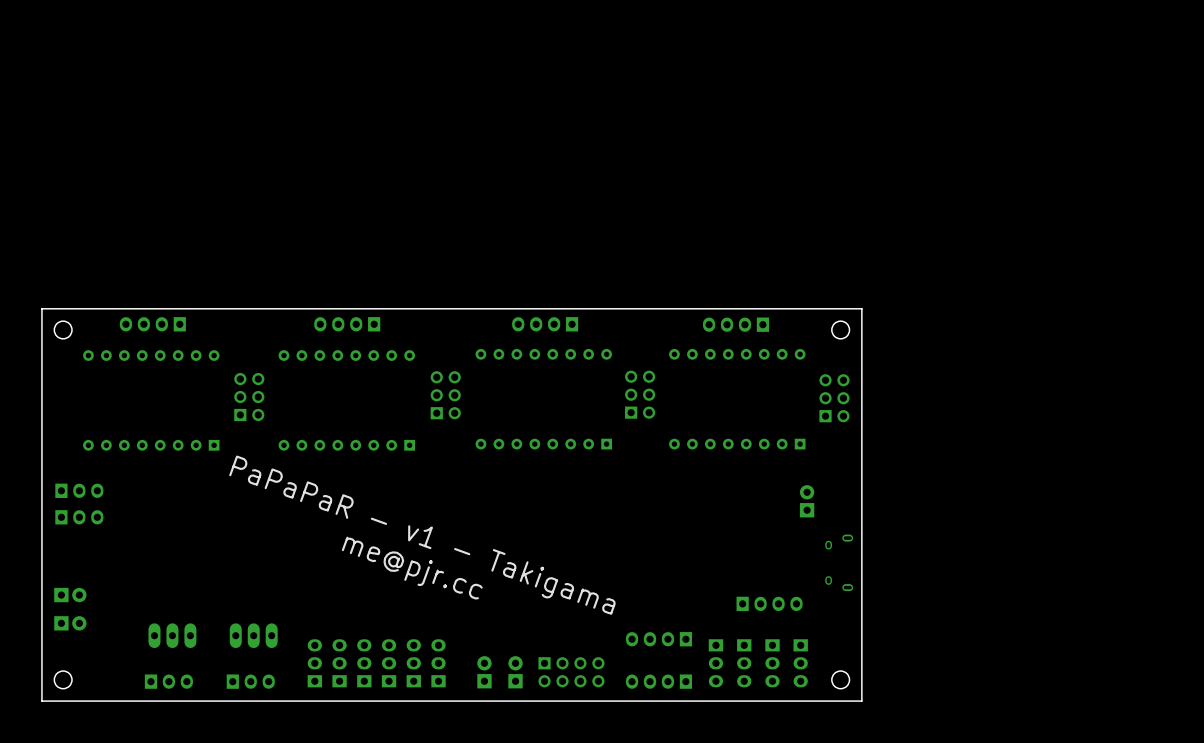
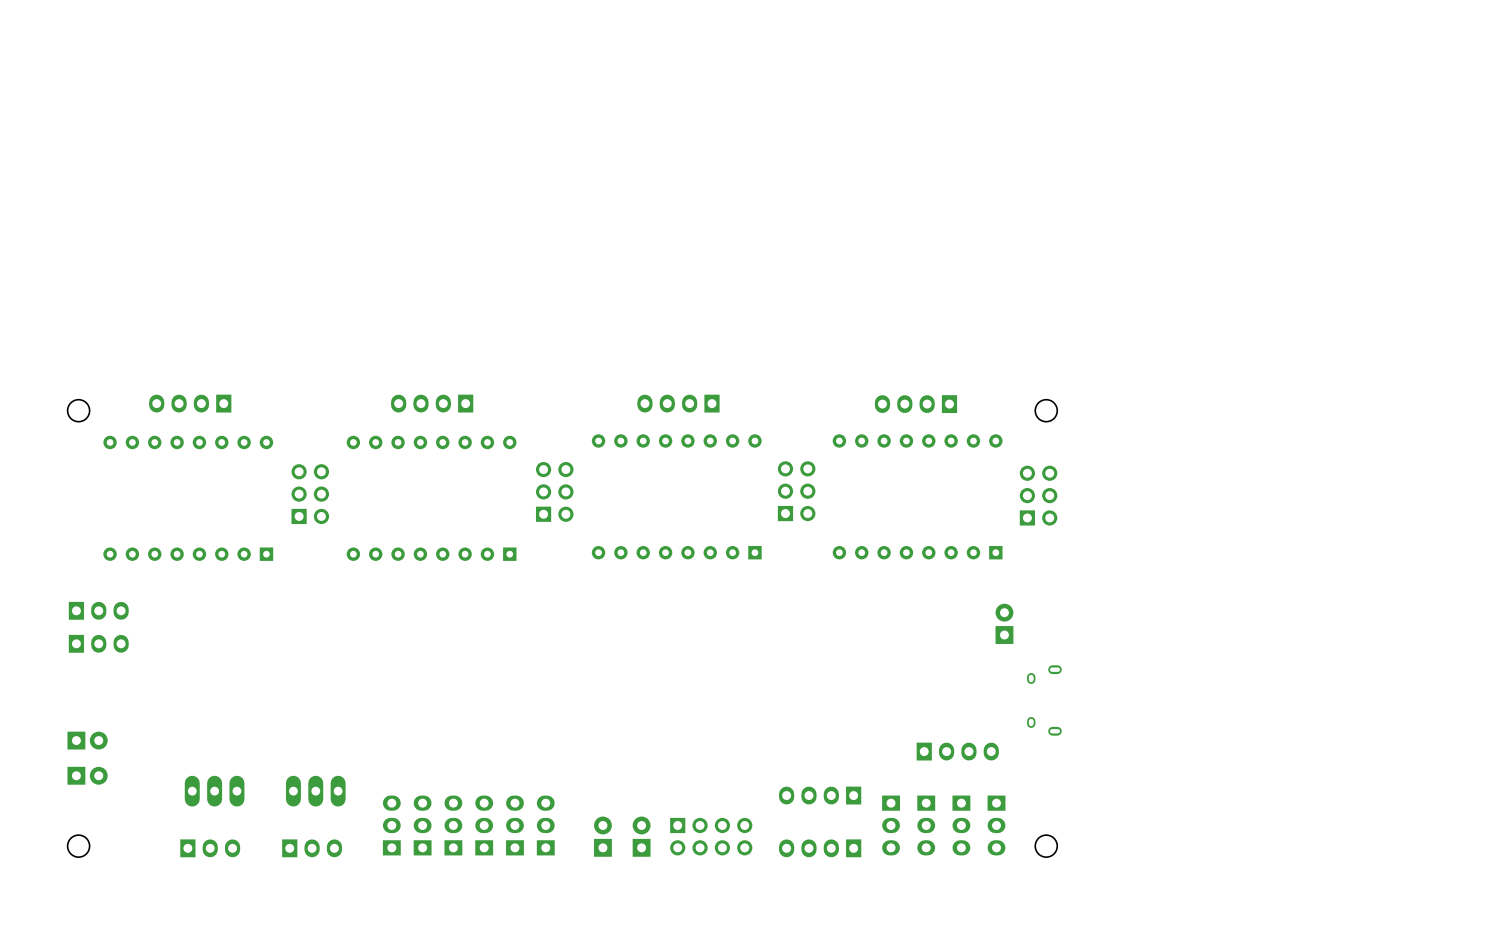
board edge: (861, 308) (861, 701) (41, 701) (41, 308) (861, 308) -> none
text: PaPaPaR - v1 - Takigama (422, 535) -> none
text: me@pjr.cc (412, 568) -> none

